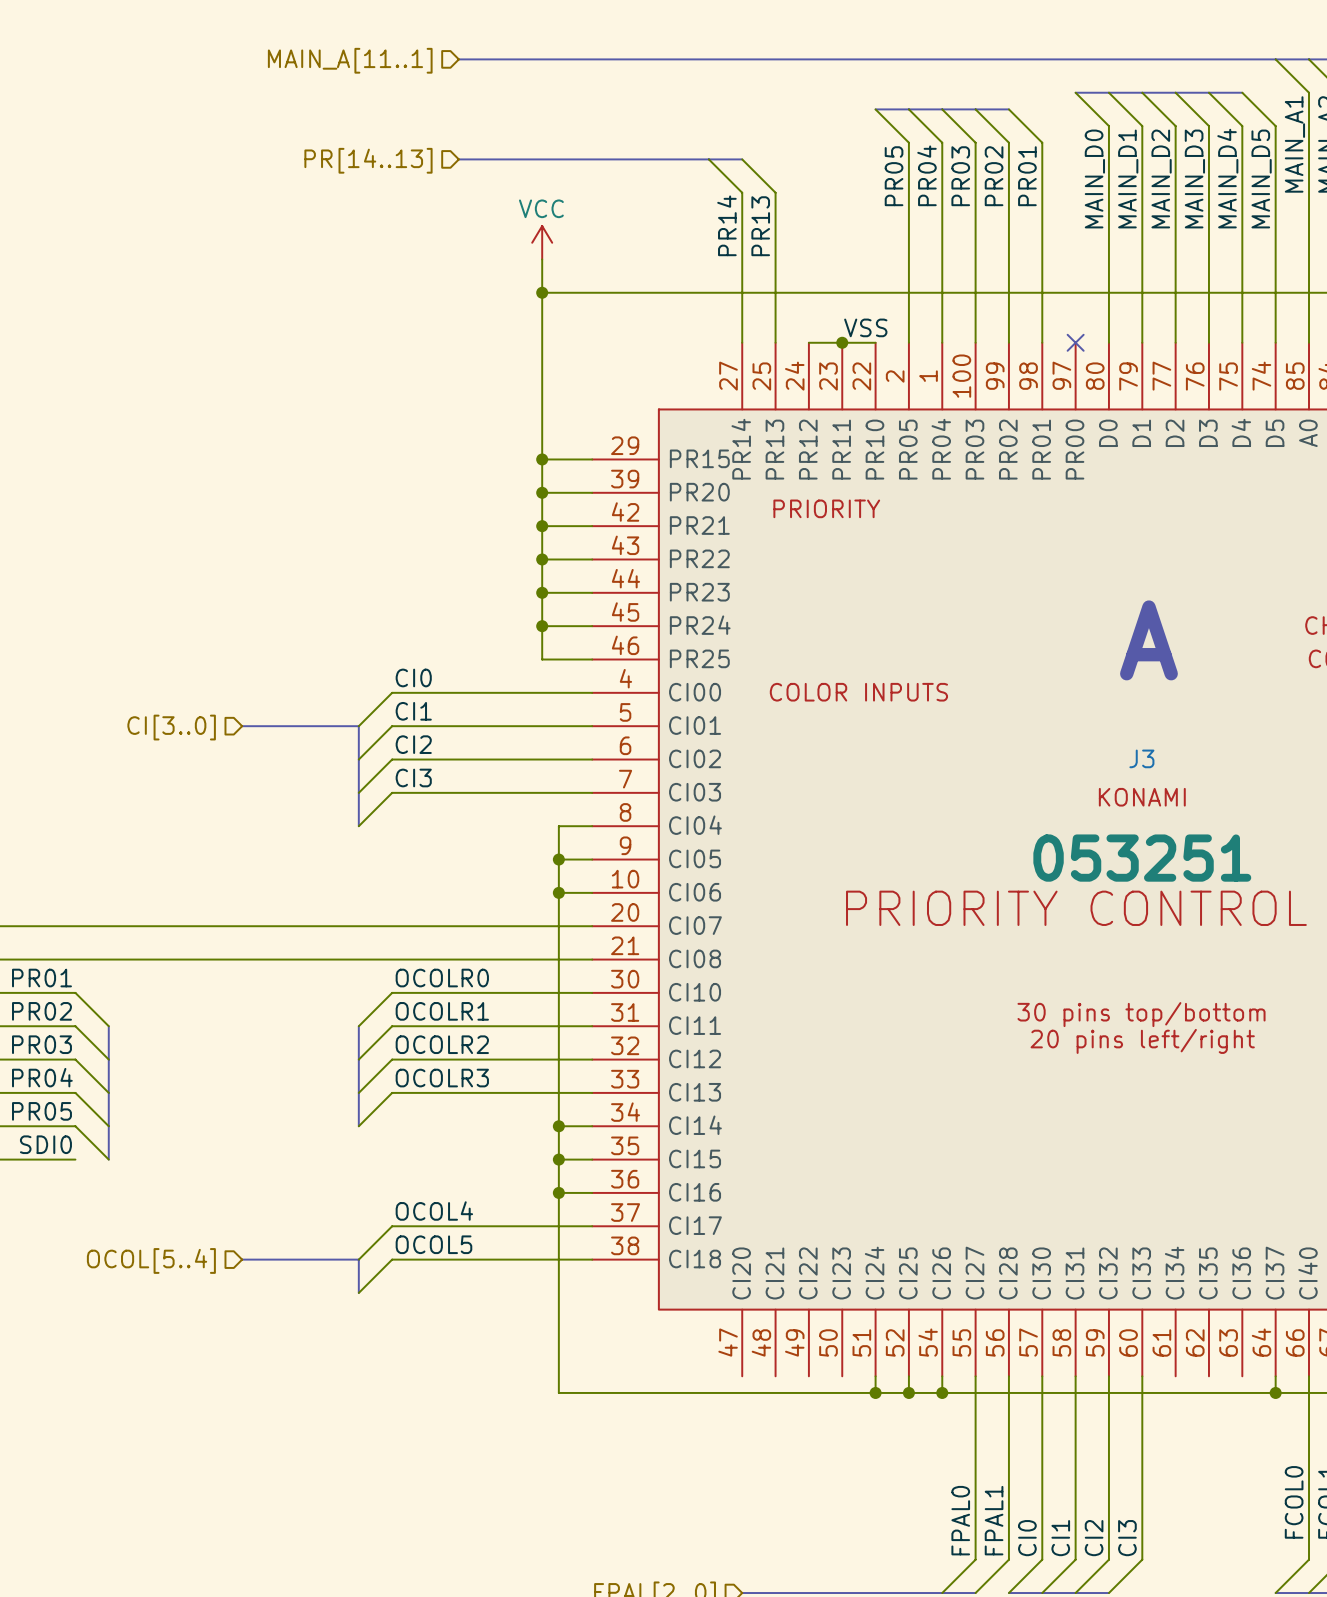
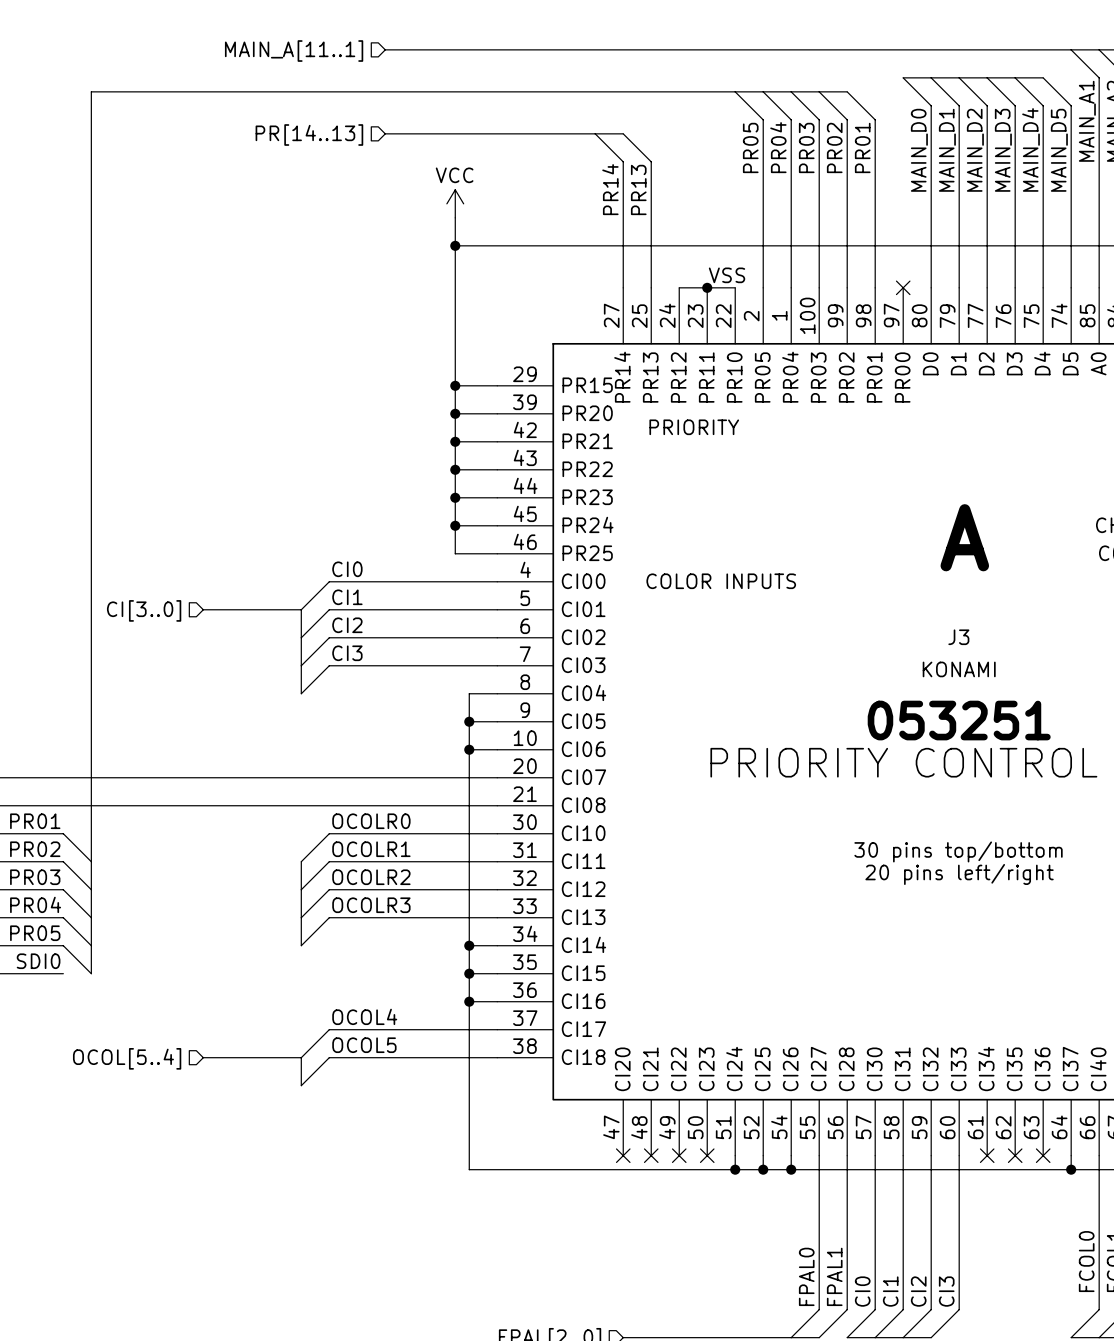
bus: none -> (735, 91) (91, 91) (91, 861)
no-connect mark: none -> (623, 1155)
no-connect mark: none -> (651, 1155)
no-connect mark: none -> (679, 1155)
no-connect mark: none -> (707, 1155)
no-connect mark: none -> (987, 1155)
no-connect mark: none -> (1015, 1155)
no-connect mark: none -> (1043, 1155)

